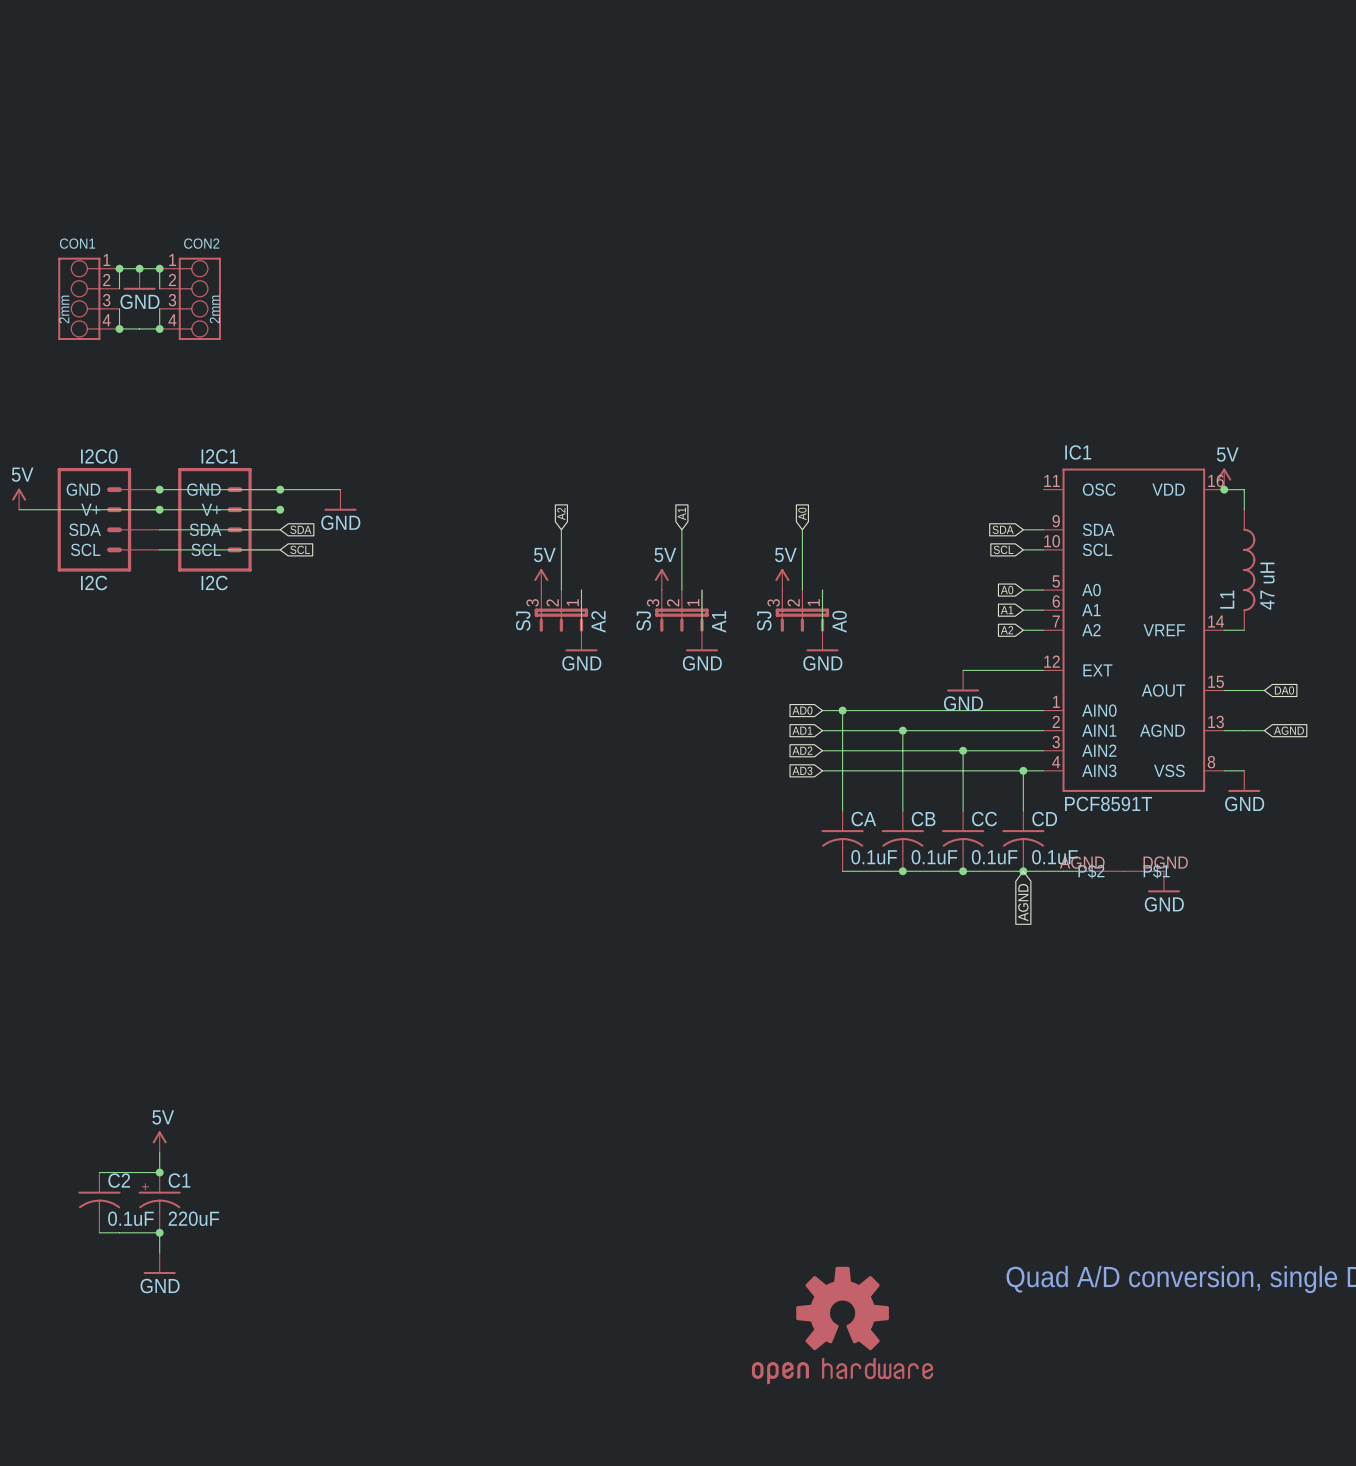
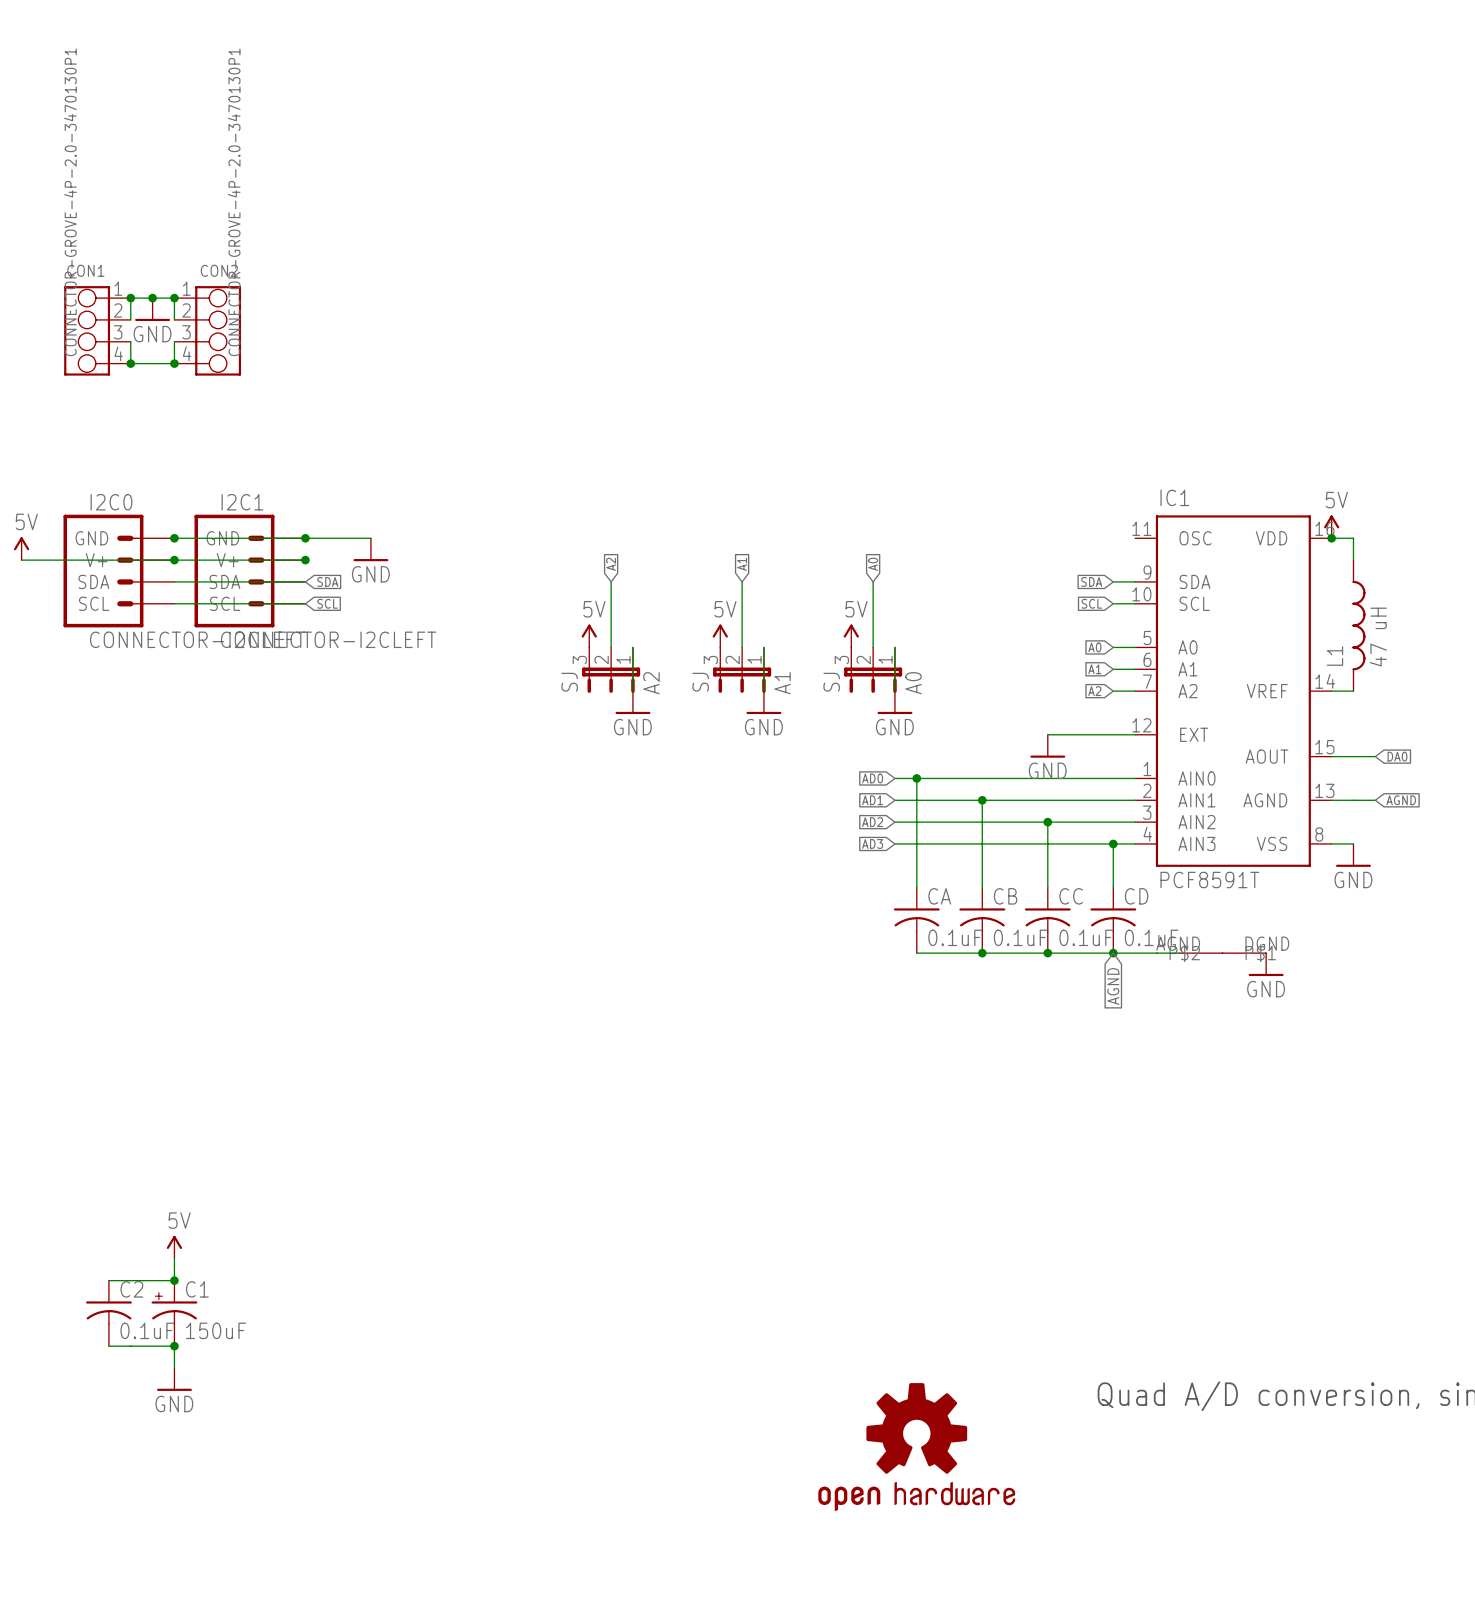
CON1 value: 2mm (64, 309) -> CONNECTOR-GROVE-4P-2.0-3470130P1 (70, 202)
CON2 value: 2mm (214, 309) -> CONNECTOR-GROVE-4P-2.0-3470130P1 (234, 202)
I2C0 value: I2C (94, 583) -> CONNECTOR-I2CLEFT (197, 639)
I2C1 value: I2C (214, 583) -> CONNECTOR-I2CLEFT (328, 639)
C1 value: 220uF (193, 1218) -> 150uF (216, 1330)

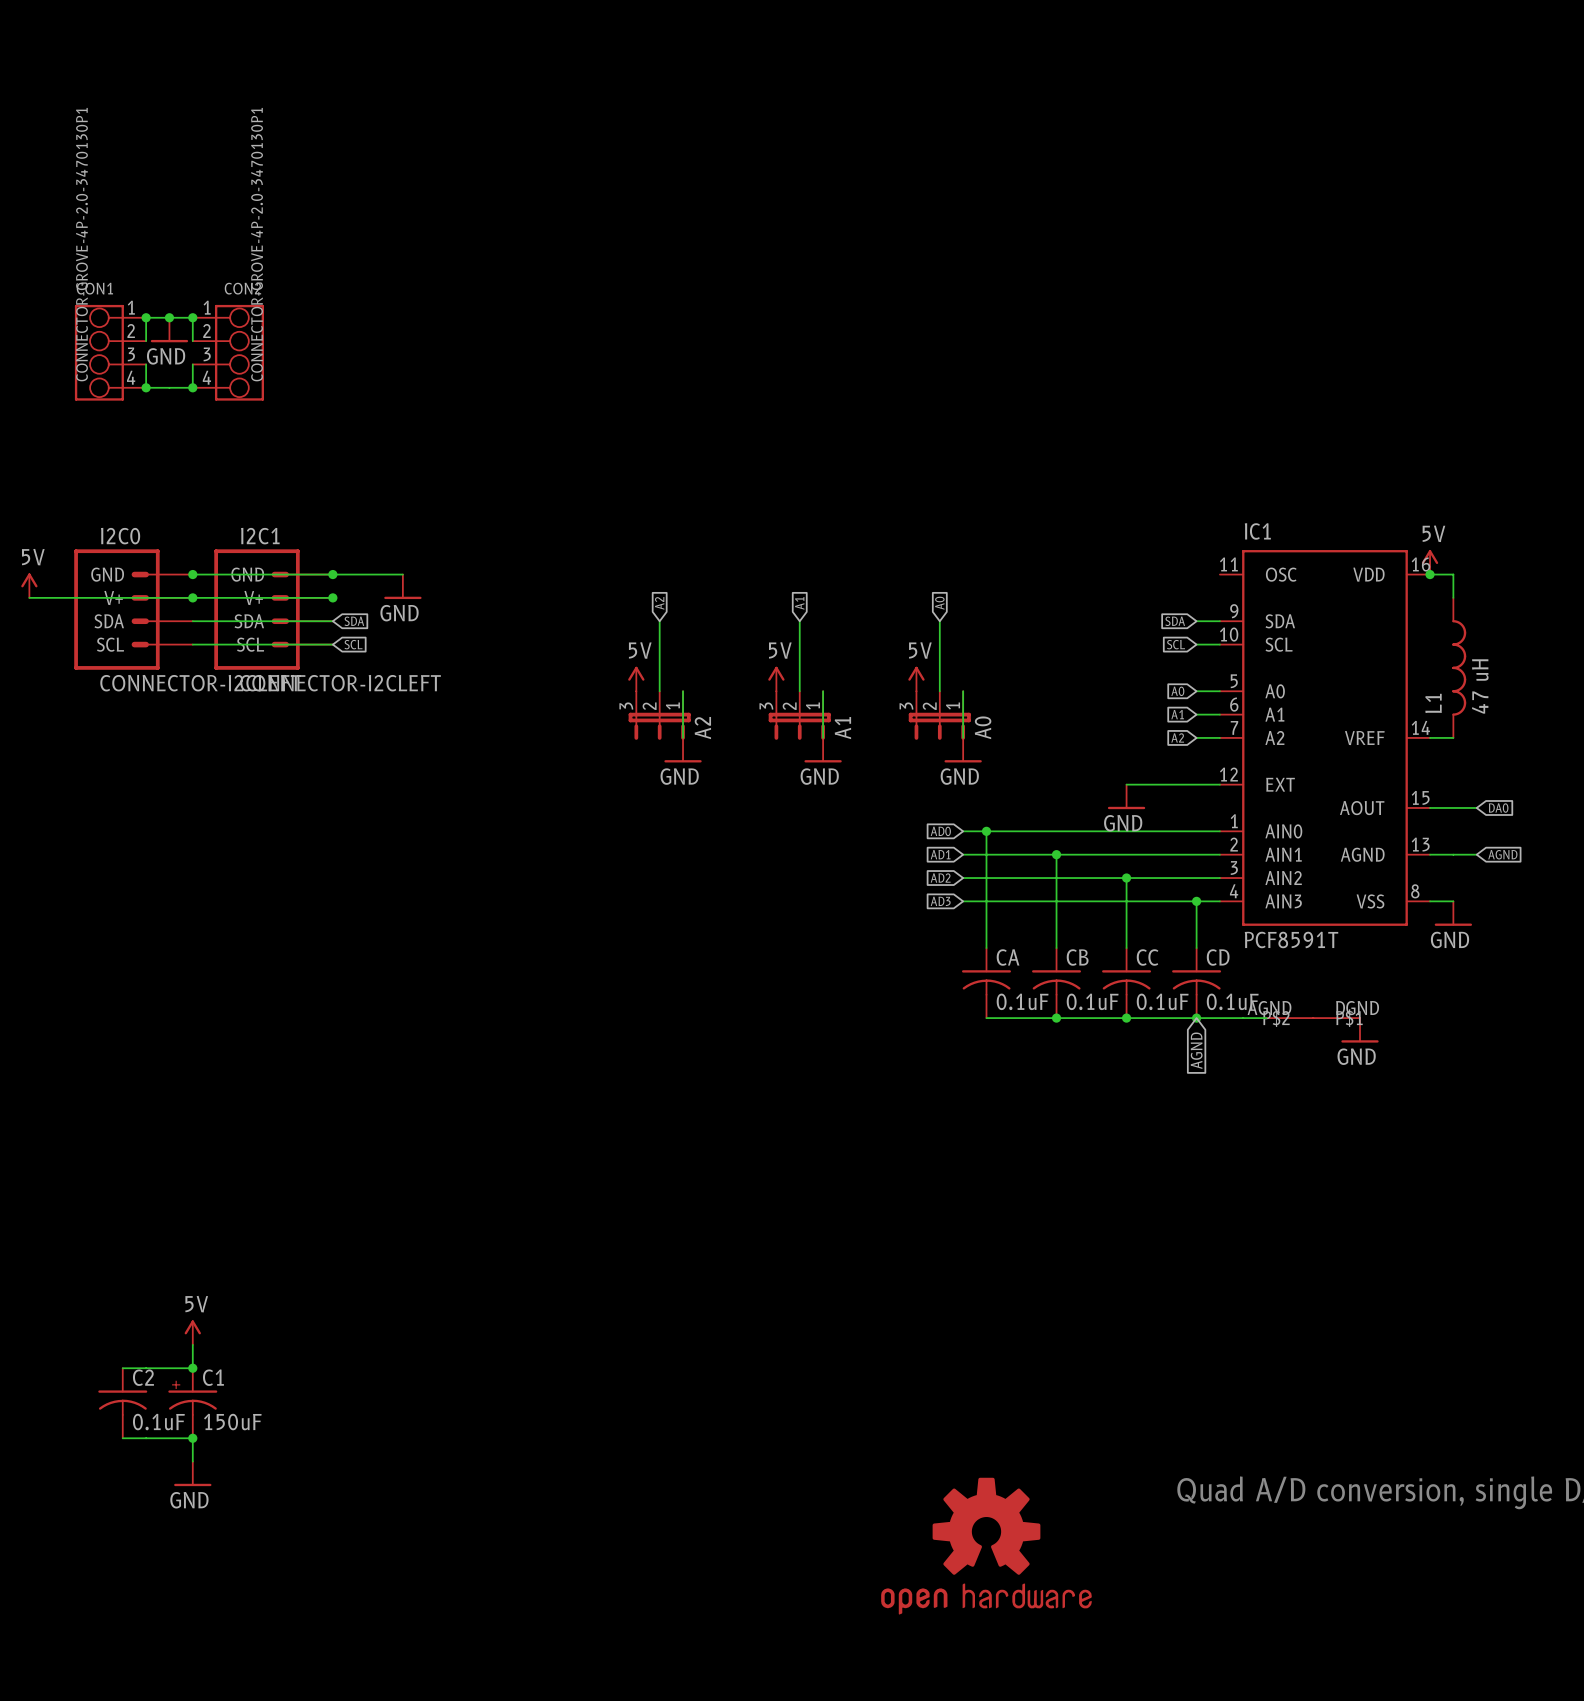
A2 value: SJ (569, 682) -> none
A1 value: SJ (700, 682) -> none
A0 value: SJ (831, 682) -> none

